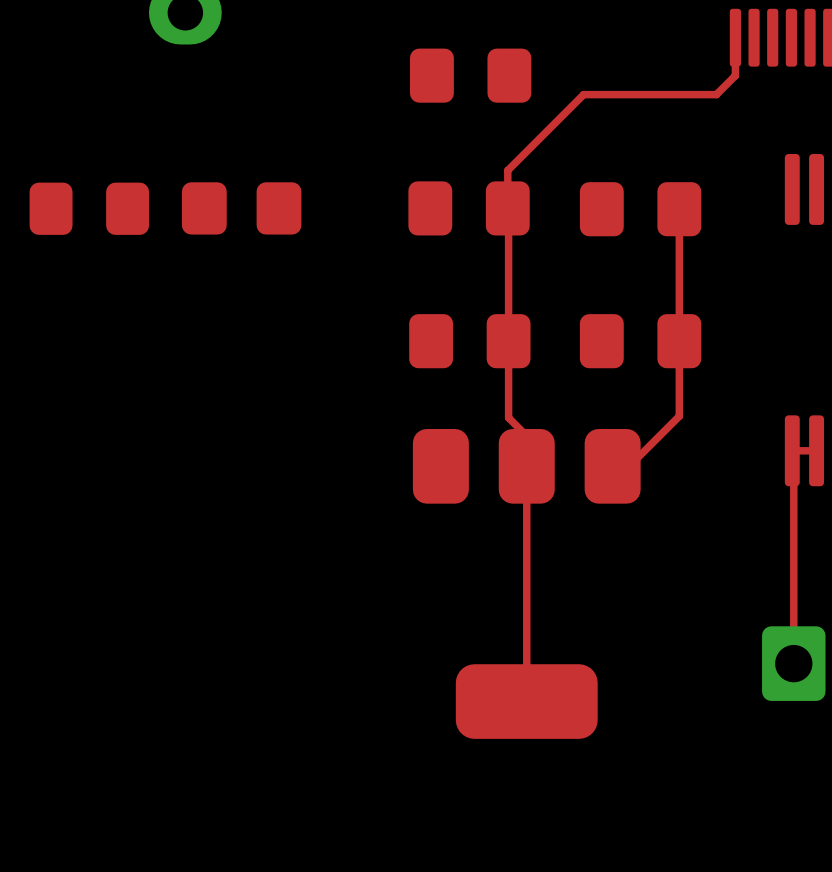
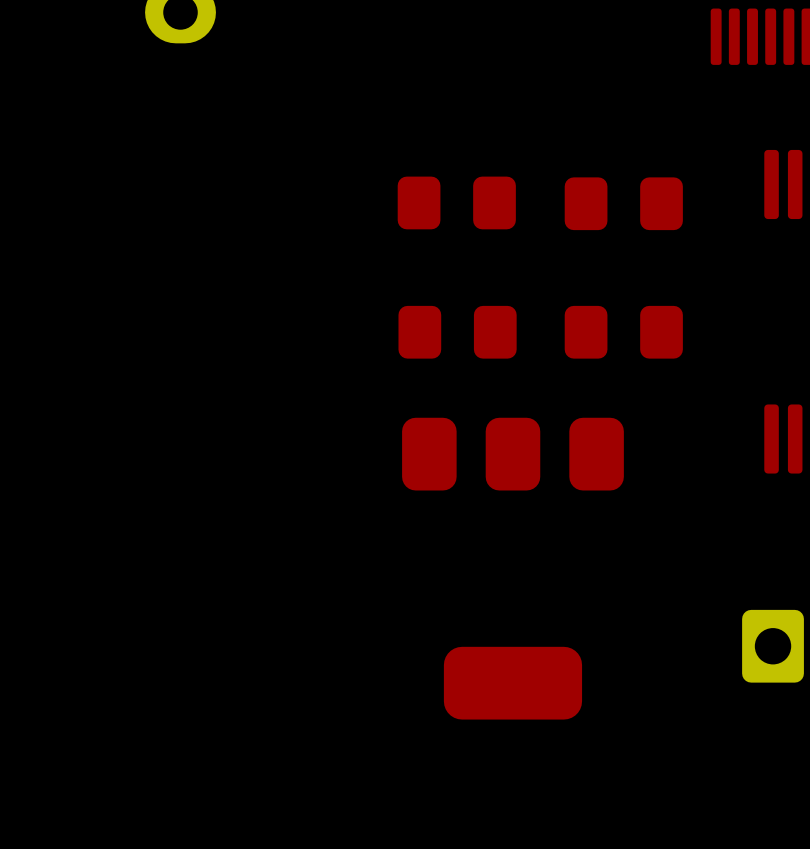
top track: (735, 37) (735, 75) (716, 94) (583, 94) (507, 170) (508, 417) (526, 436) (526, 701) -> none
part: (470, 75) -> none
part: (89, 208) -> none
part: (241, 208) -> none
top track: (679, 209) (679, 416) (629, 466) (612, 466) -> none
top track: (816, 450) (792, 450) (793, 663) -> none

